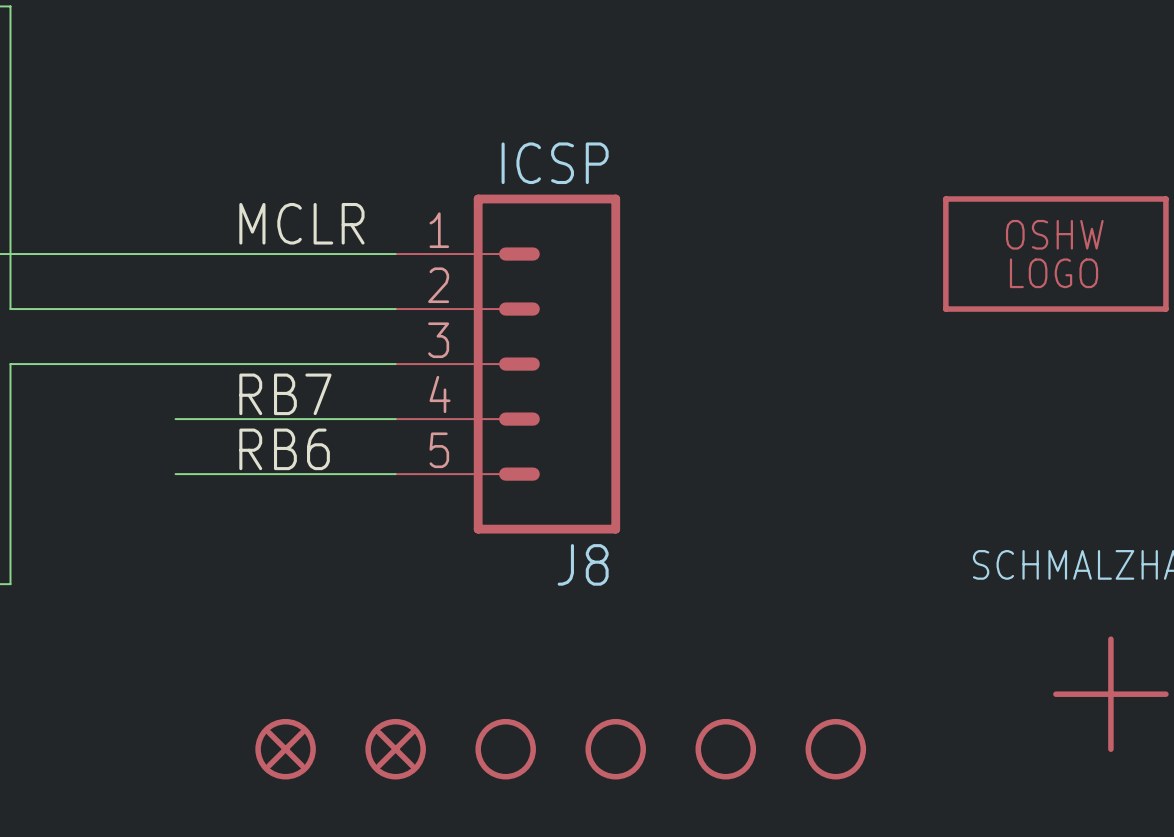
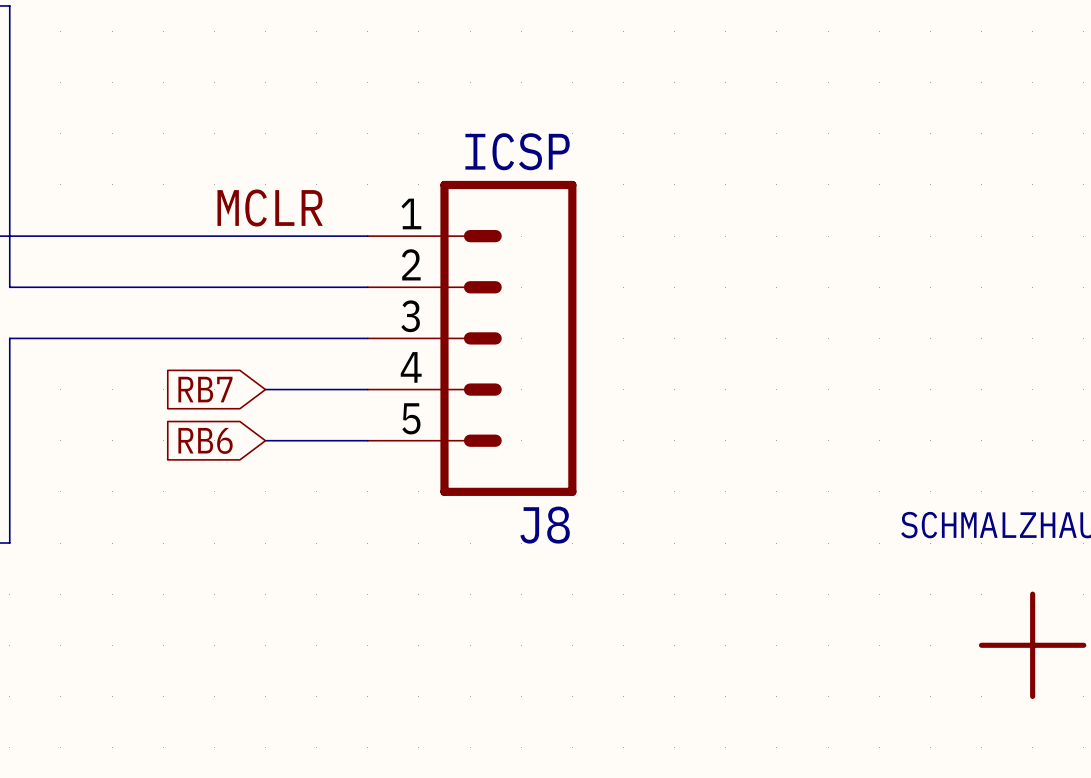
part: (1055, 254) -> none
label: RB7 (285, 394) -> none
wire: (175, 419) (285, 419) -> none
global label: none -> RB7 (205, 389)
label: RB6 (284, 449) -> none
wire: (175, 474) (285, 474) -> none
global label: none -> RB6 (205, 440)
part: (285, 749) -> none
part: (395, 749) -> none
part: (505, 749) -> none
part: (615, 749) -> none
part: (725, 749) -> none
part: (835, 749) -> none

